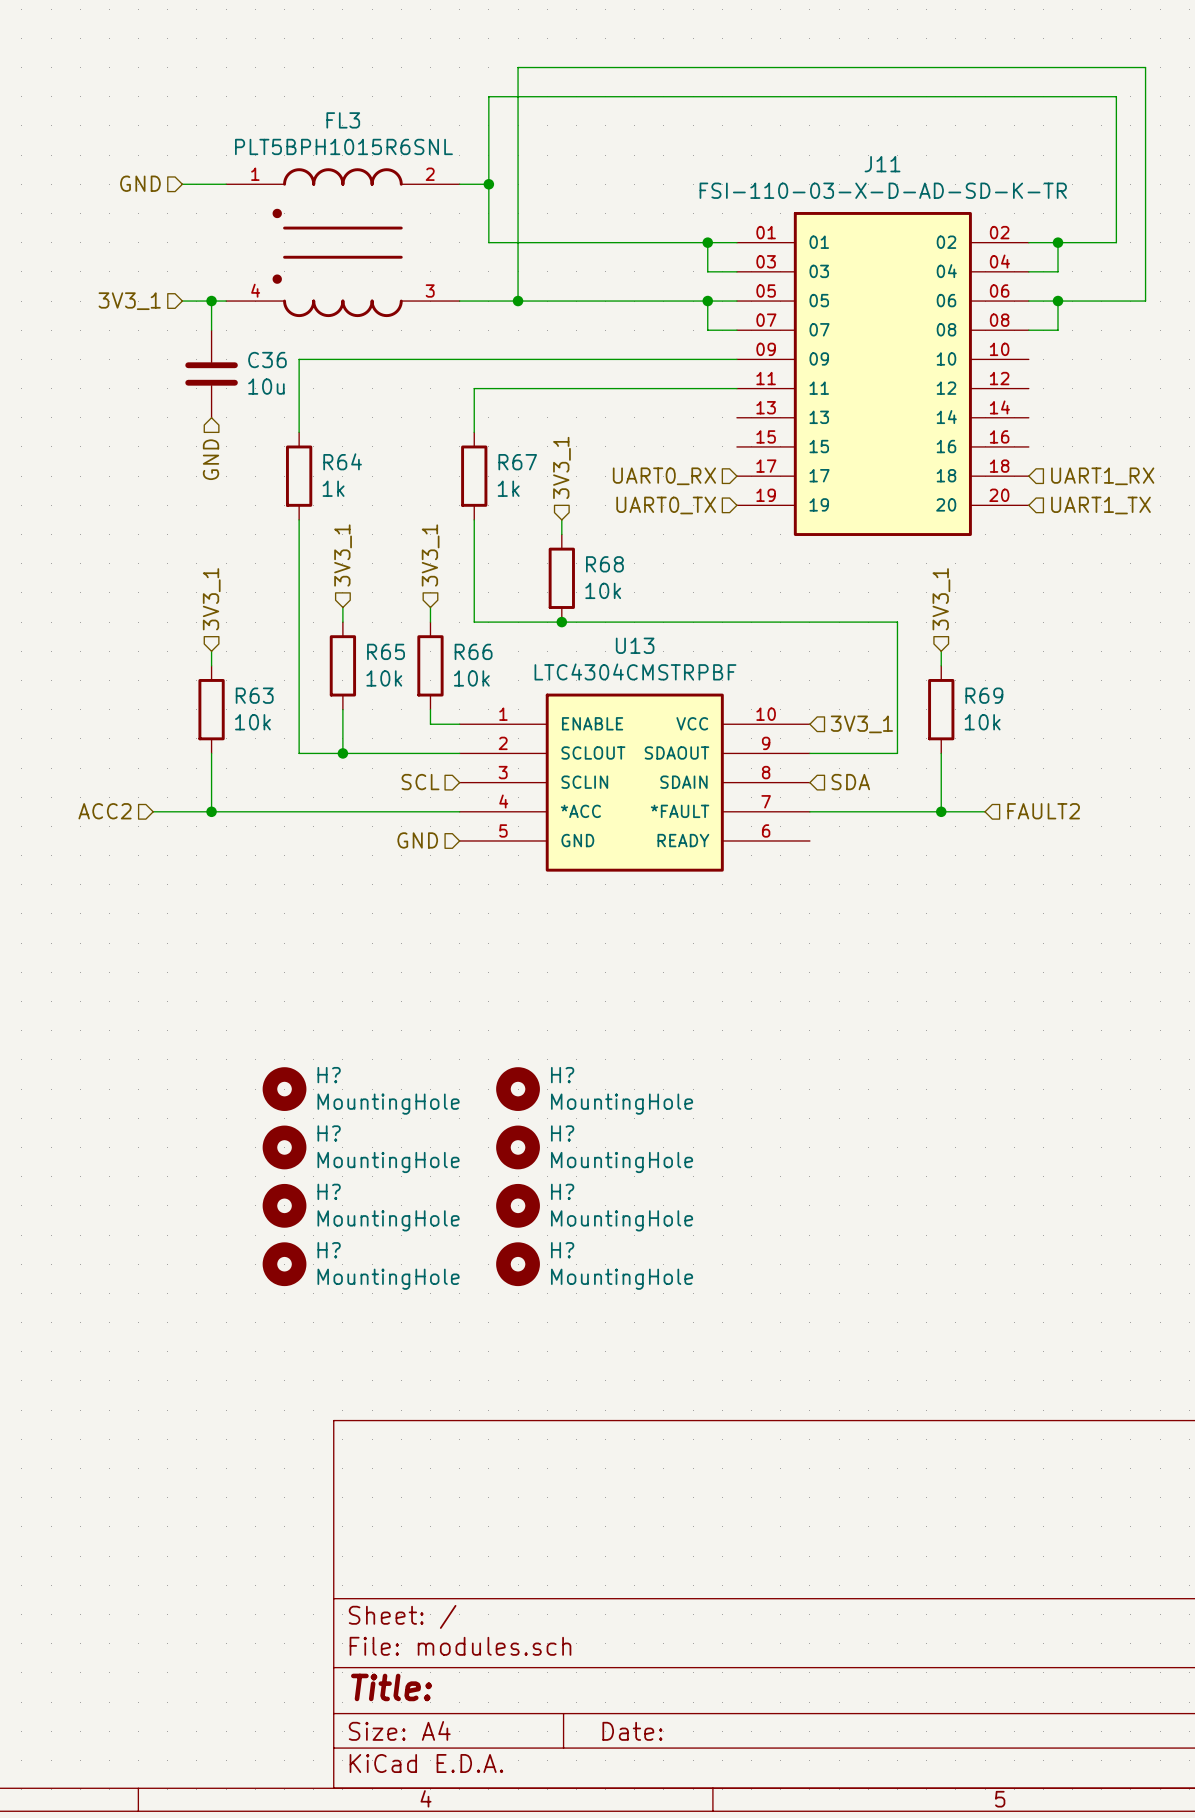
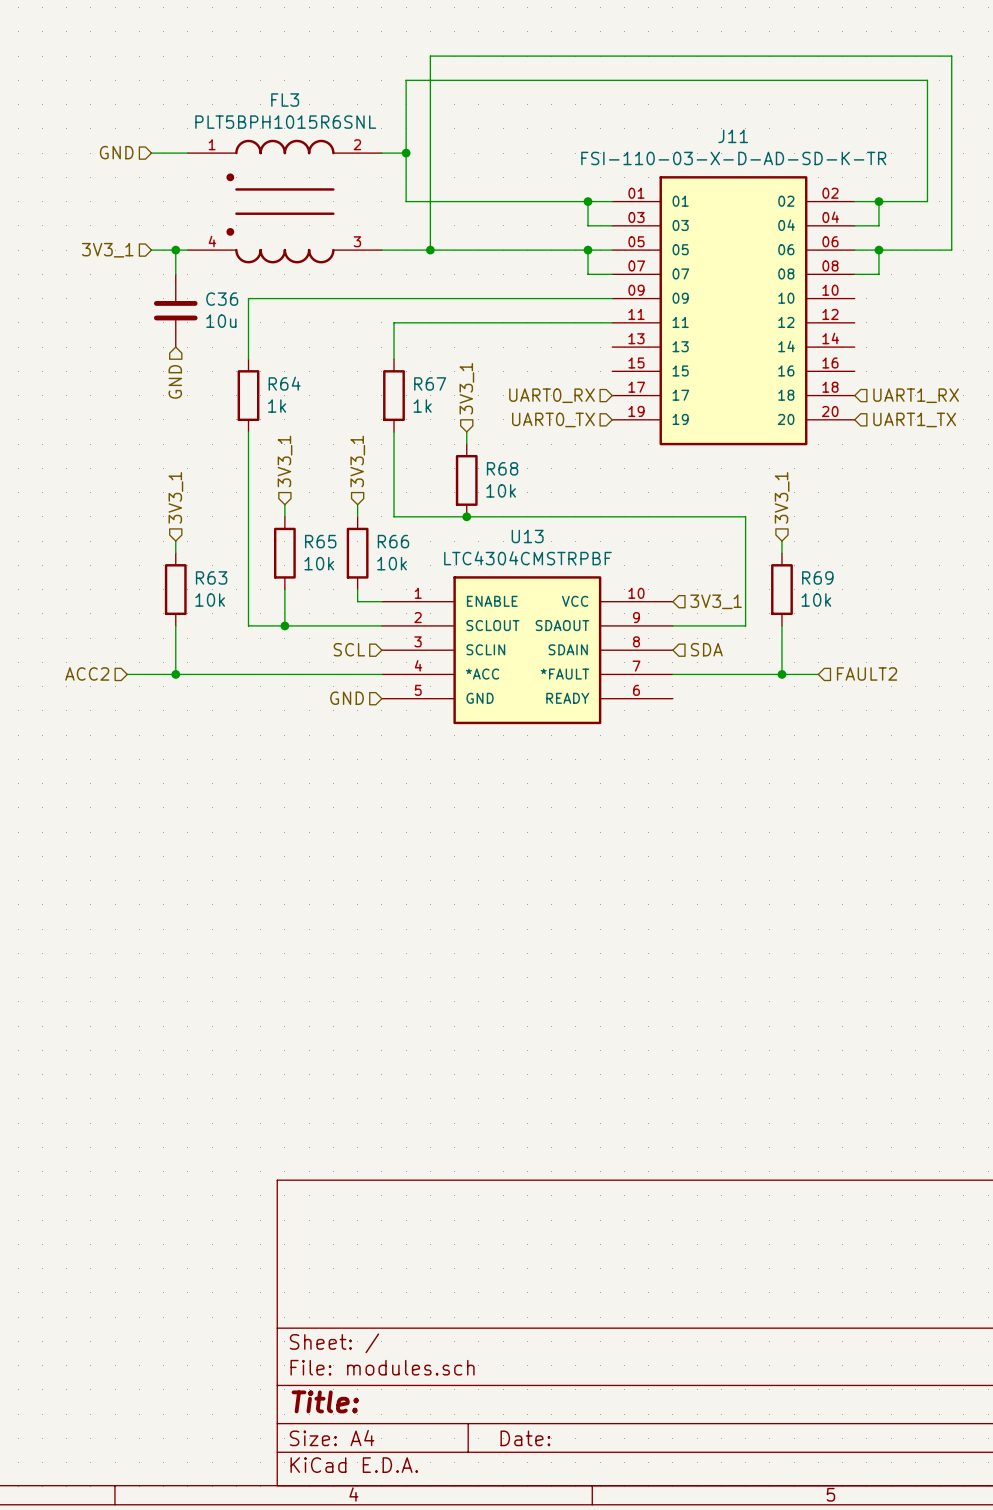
H?: MountingHole (284, 1089) -> none
H?: MountingHole (518, 1089) -> none
H?: MountingHole (284, 1147) -> none
H?: MountingHole (518, 1147) -> none
H?: MountingHole (284, 1205) -> none
H?: MountingHole (518, 1205) -> none
H?: MountingHole (284, 1264) -> none
H?: MountingHole (518, 1264) -> none

